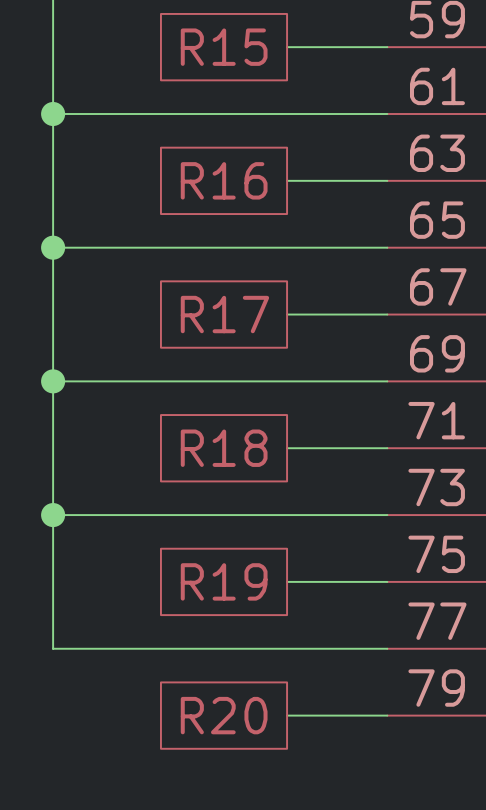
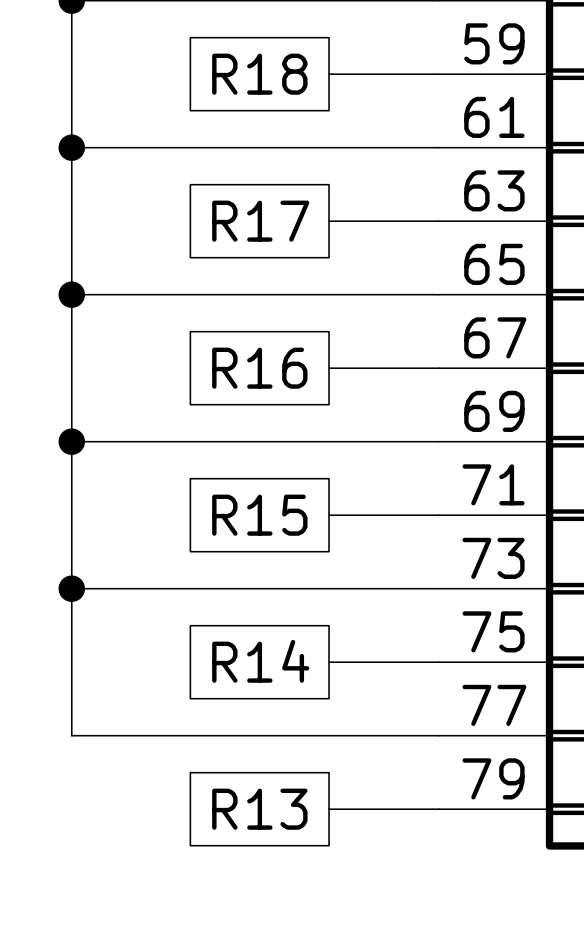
global label: R15 (224, 47) -> R18 (259, 74)
global label: R16 (224, 180) -> R17 (260, 221)
global label: R17 (224, 314) -> R16 (259, 368)
global label: R18 (224, 448) -> R15 (259, 515)
global label: R19 (224, 581) -> R14 (260, 661)
global label: R20 (224, 715) -> R13 (259, 809)

